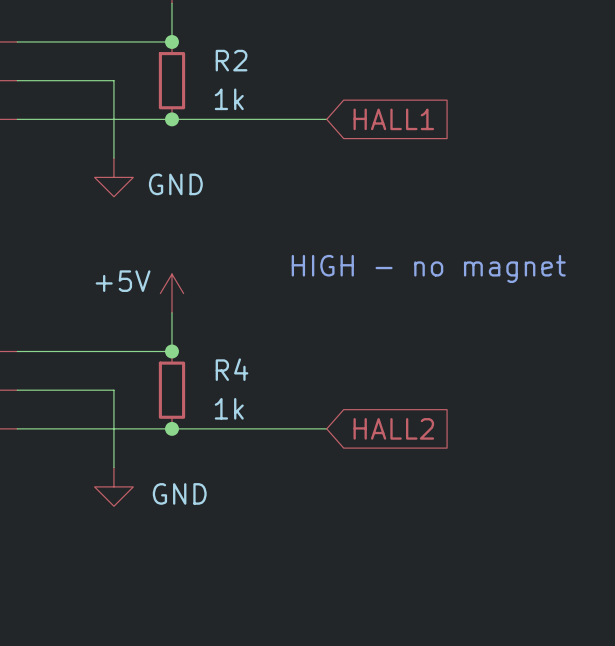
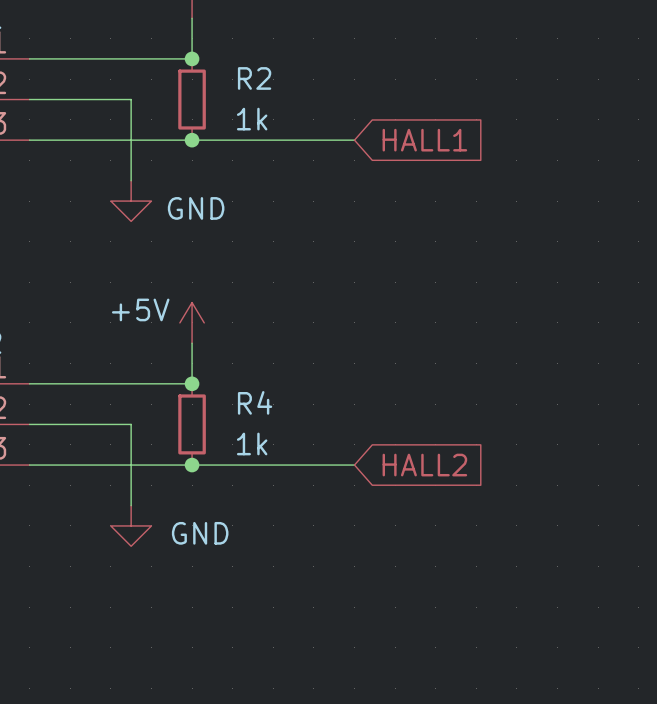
text: HIGH - no magnet (428, 268) -> none

